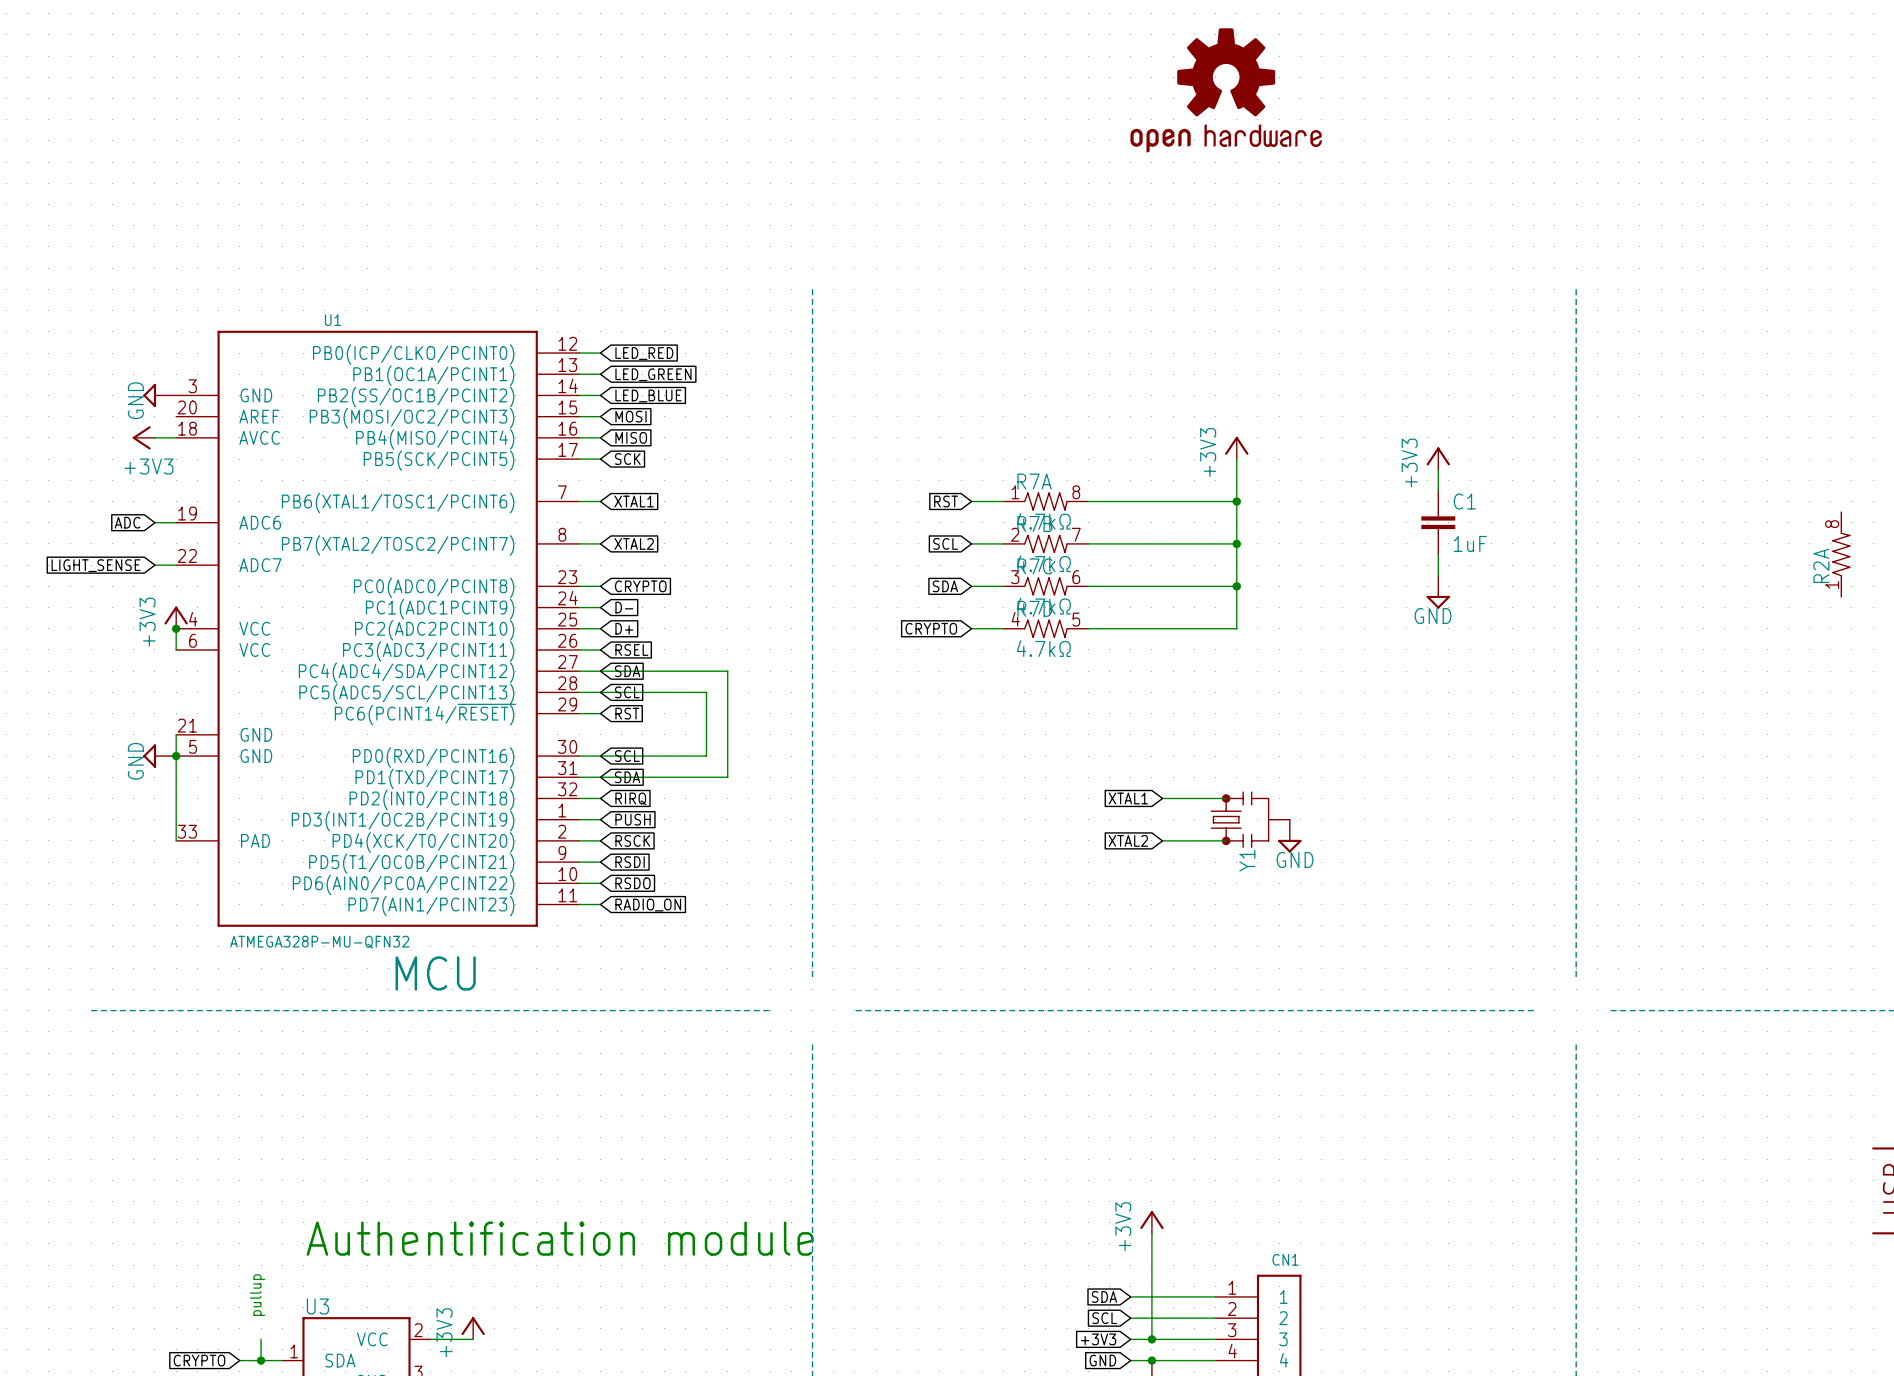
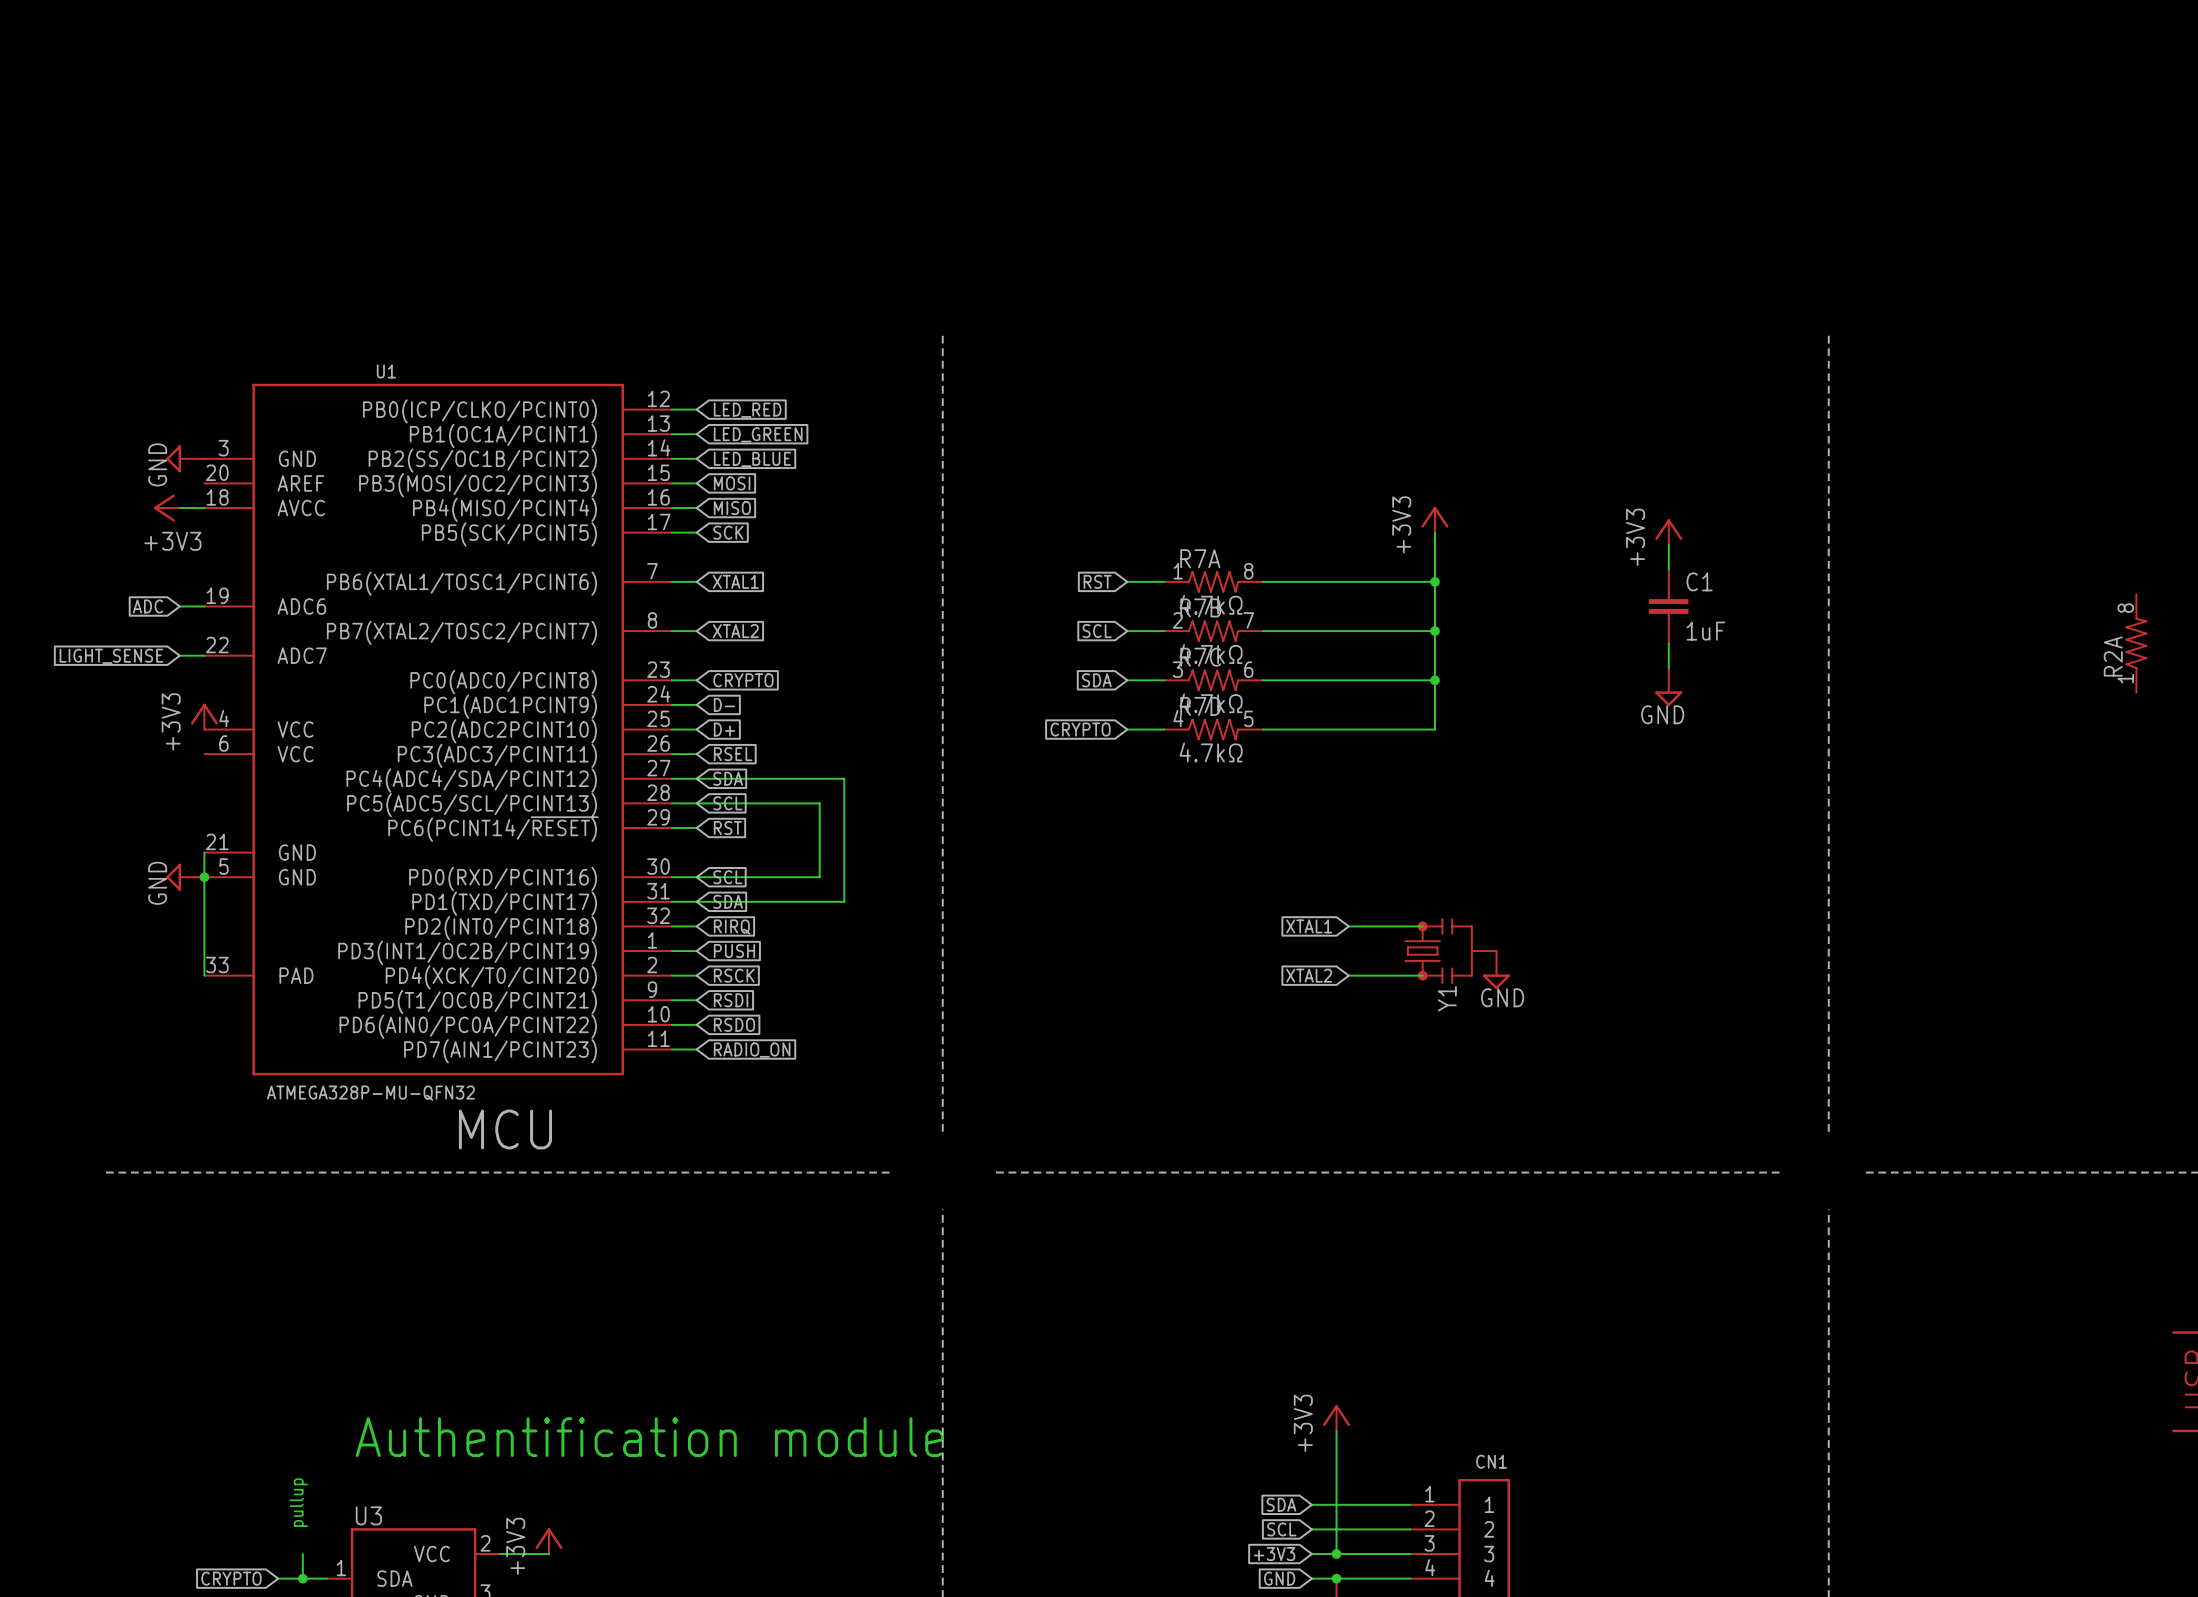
part: (1226, 90) -> none
wire: (176, 628) (176, 649) -> none
junction: (176, 628) -> none

